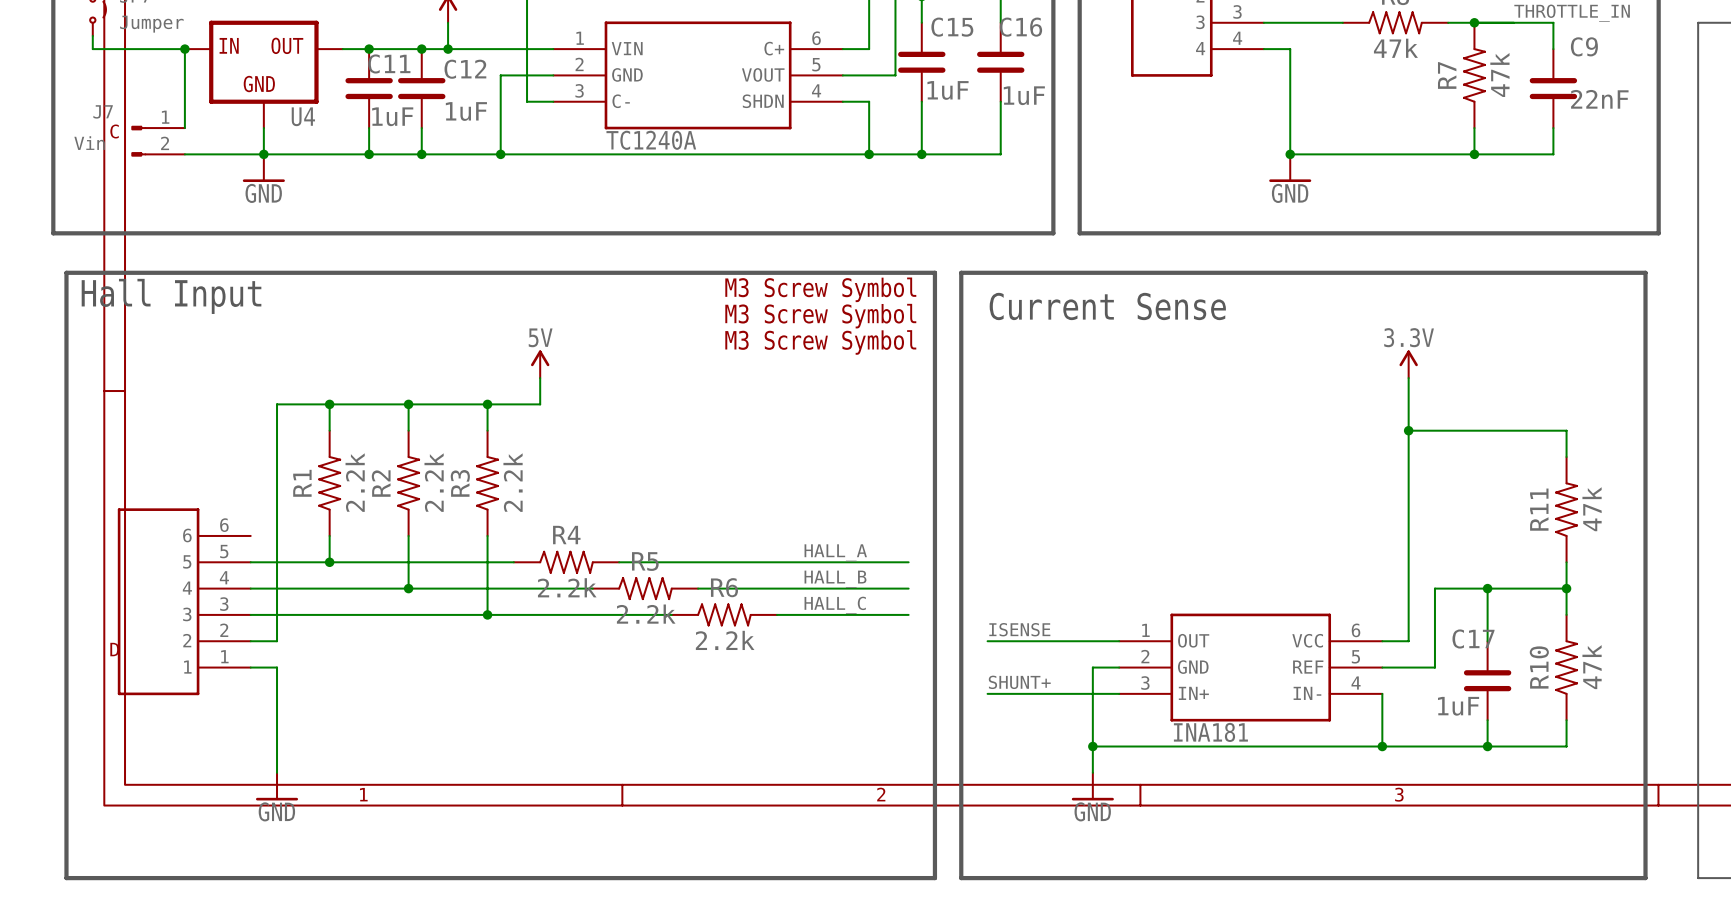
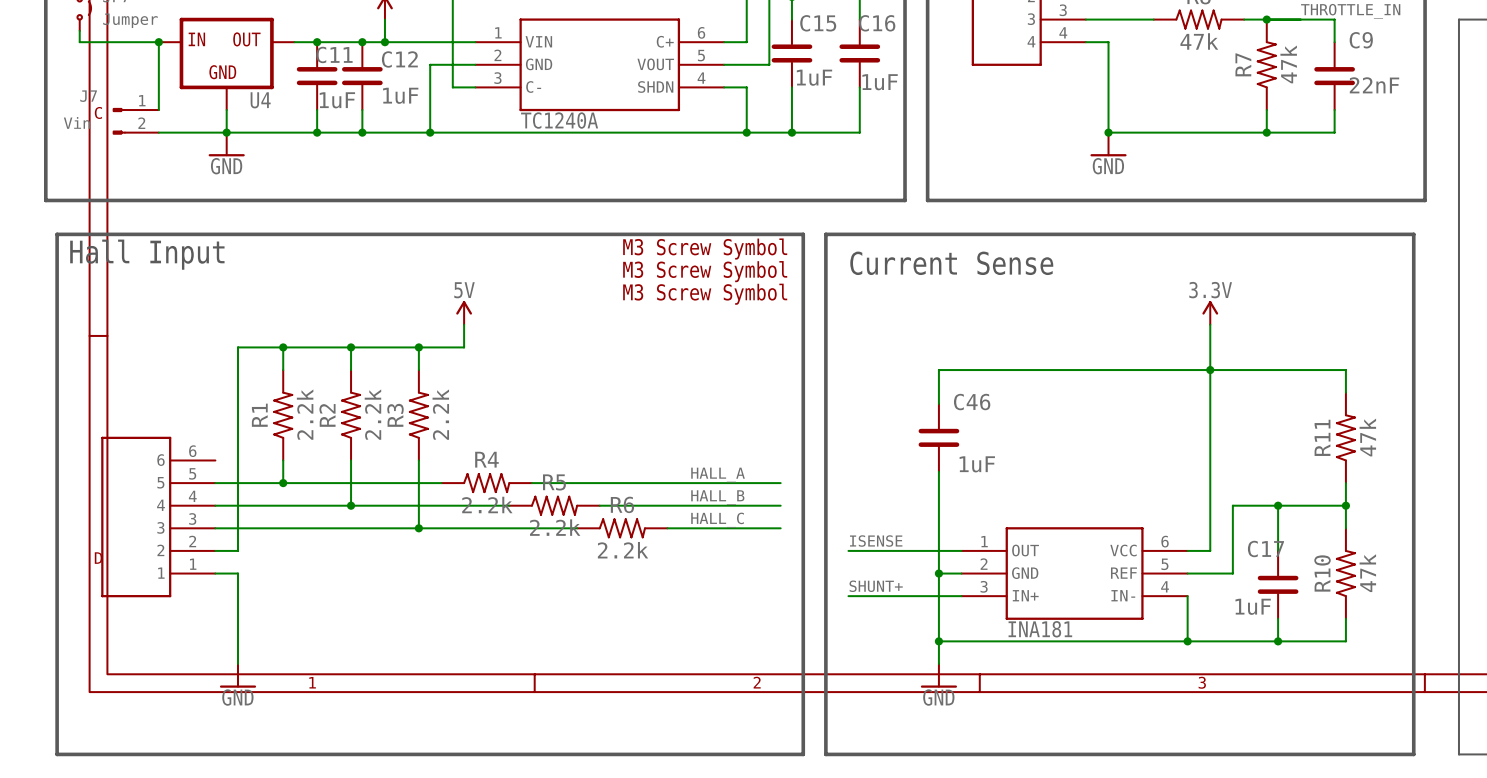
wire: none -> (1210, 370) (938, 370) (938, 403)
C46: none -> 1uF (938, 437)
wire: none -> (938, 471) (938, 573)
junction: none -> (938, 573)

